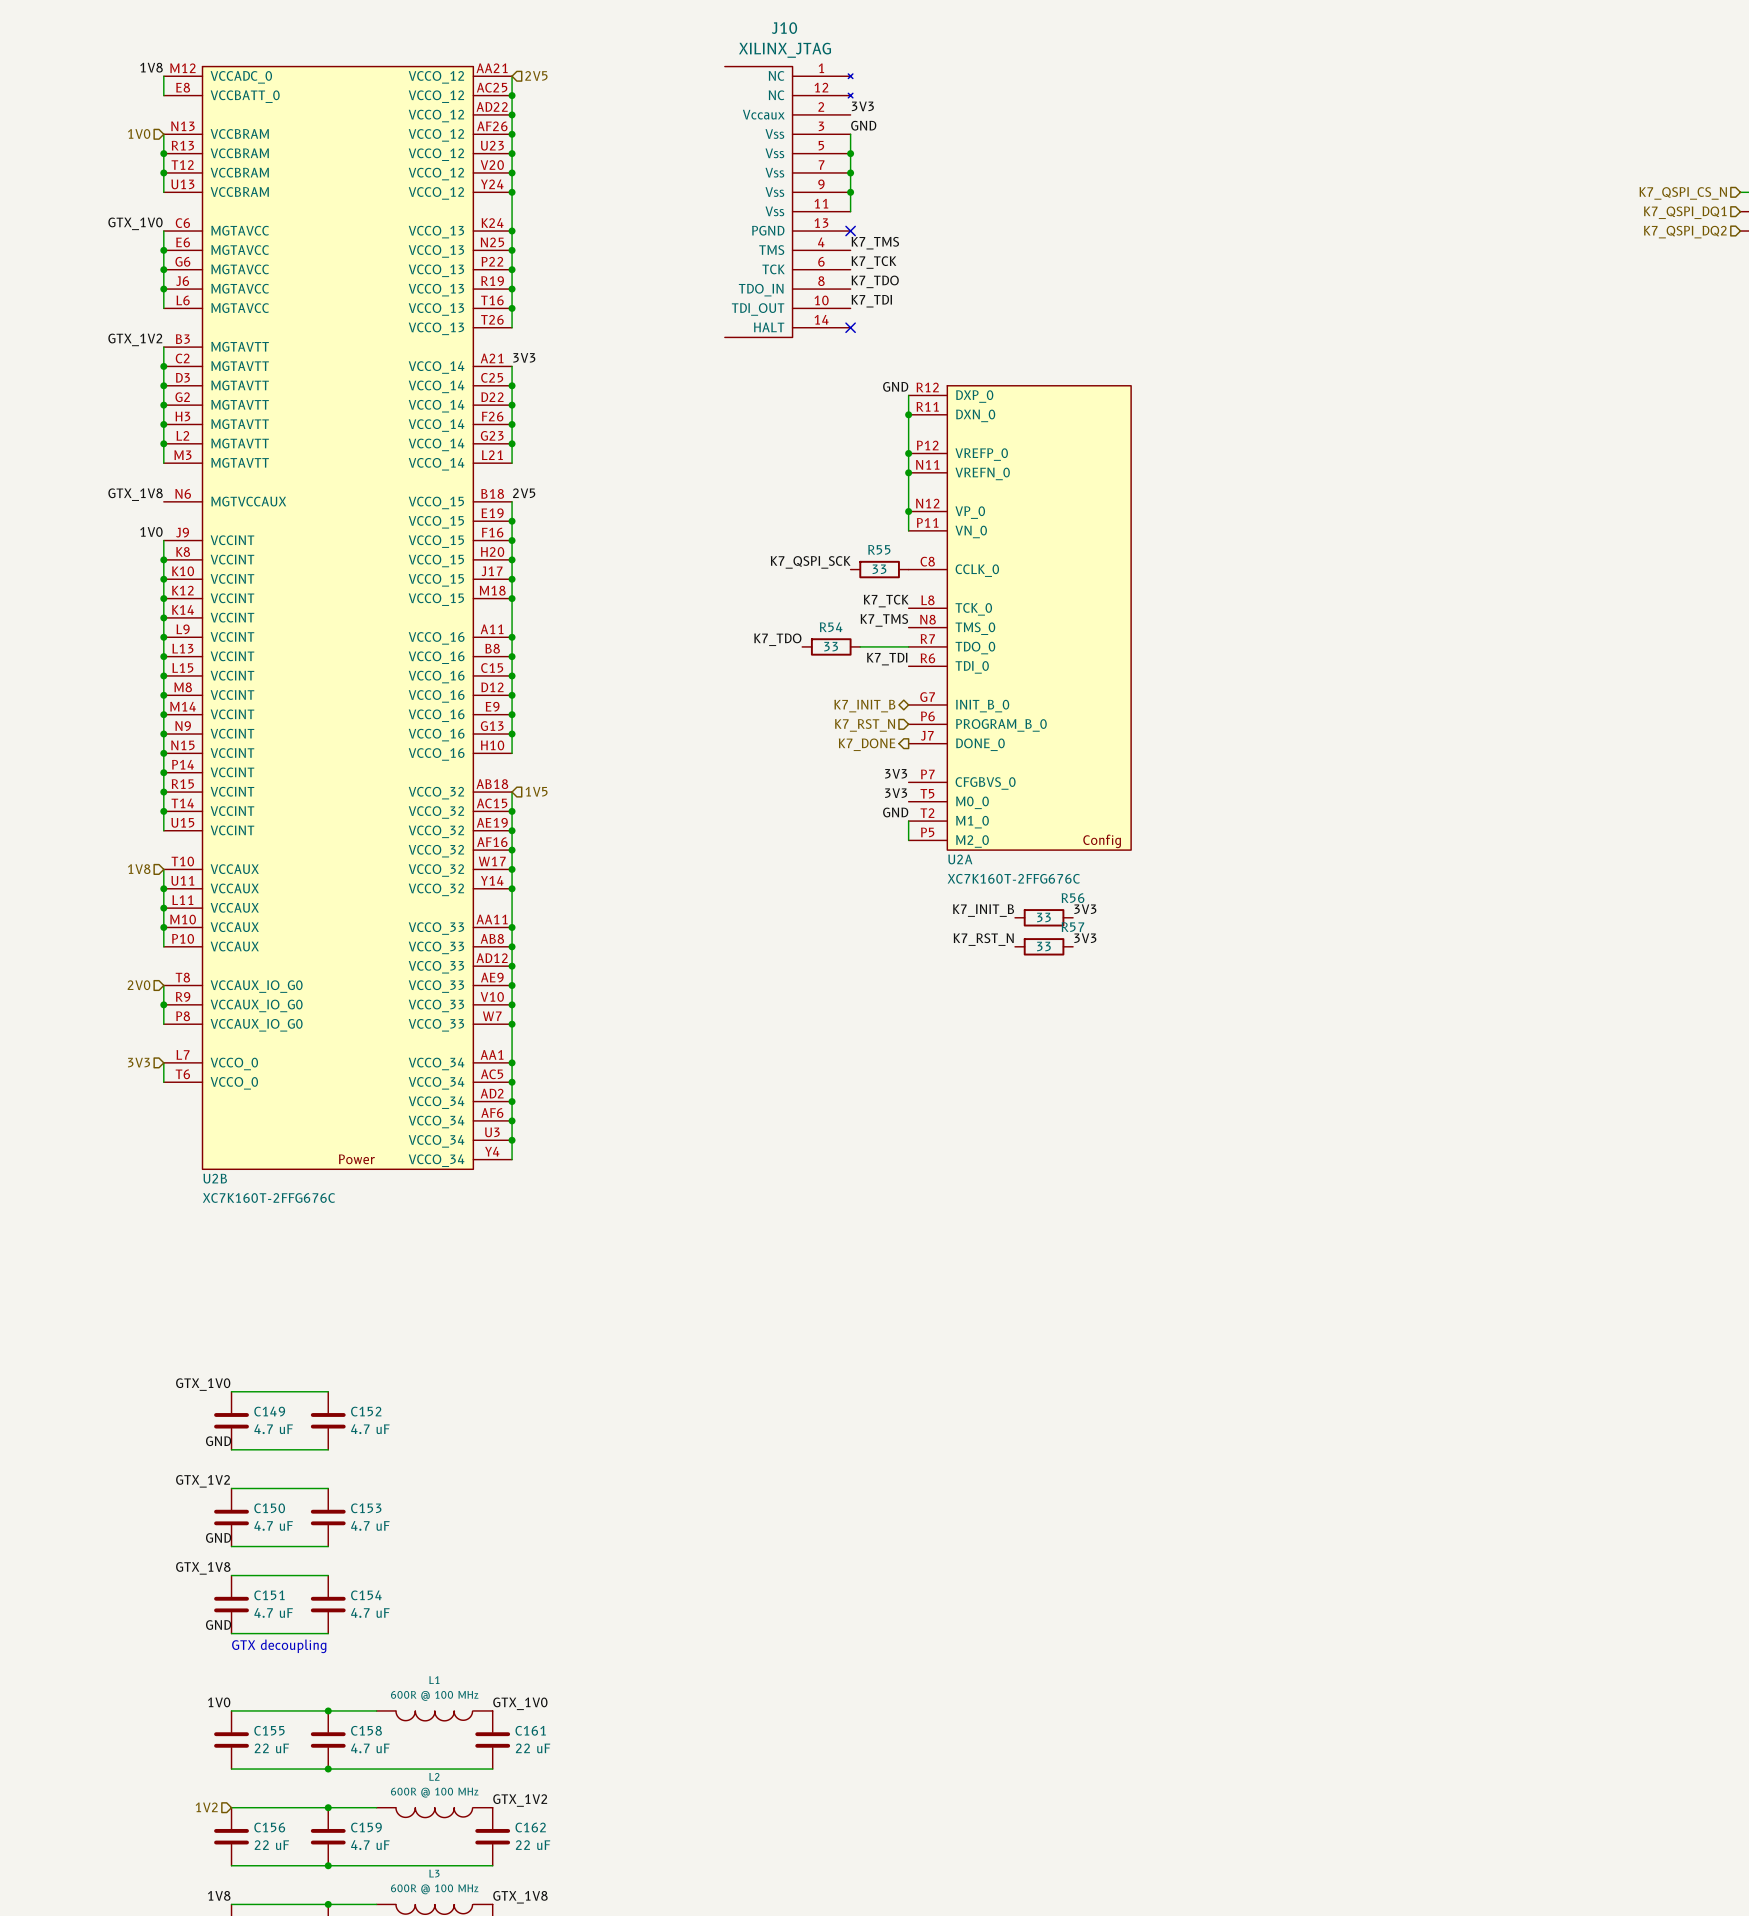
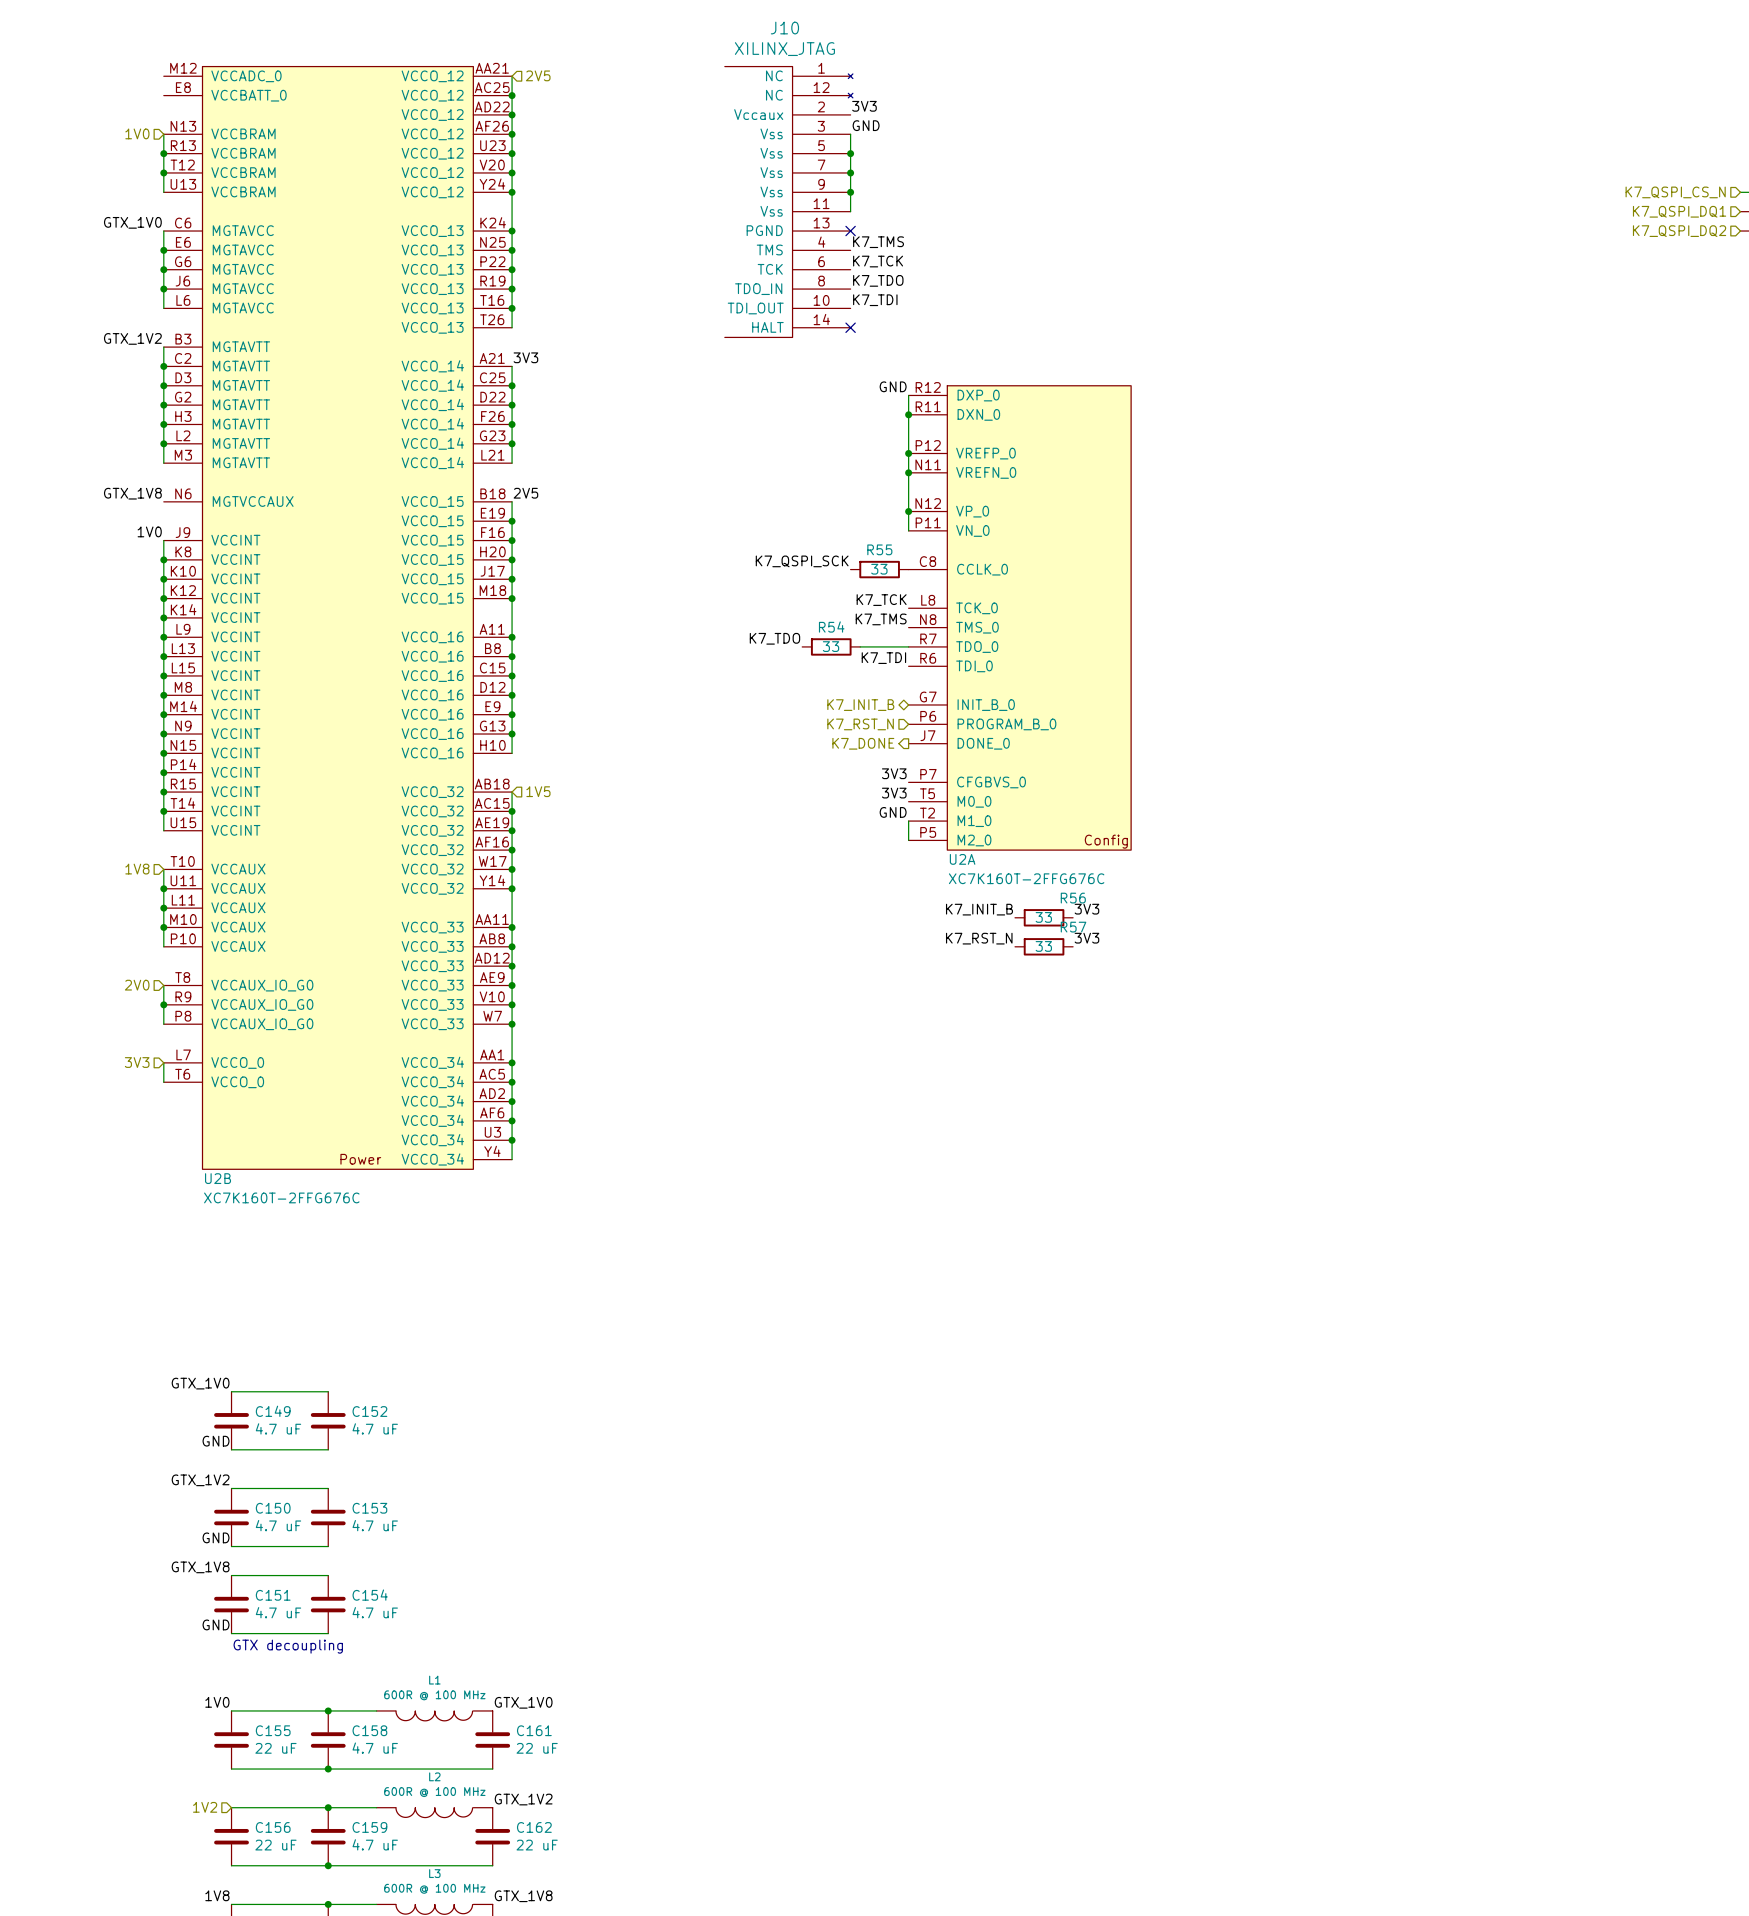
label: 1V8 (151, 67) -> none
wire: (163, 76) (163, 95) -> none

